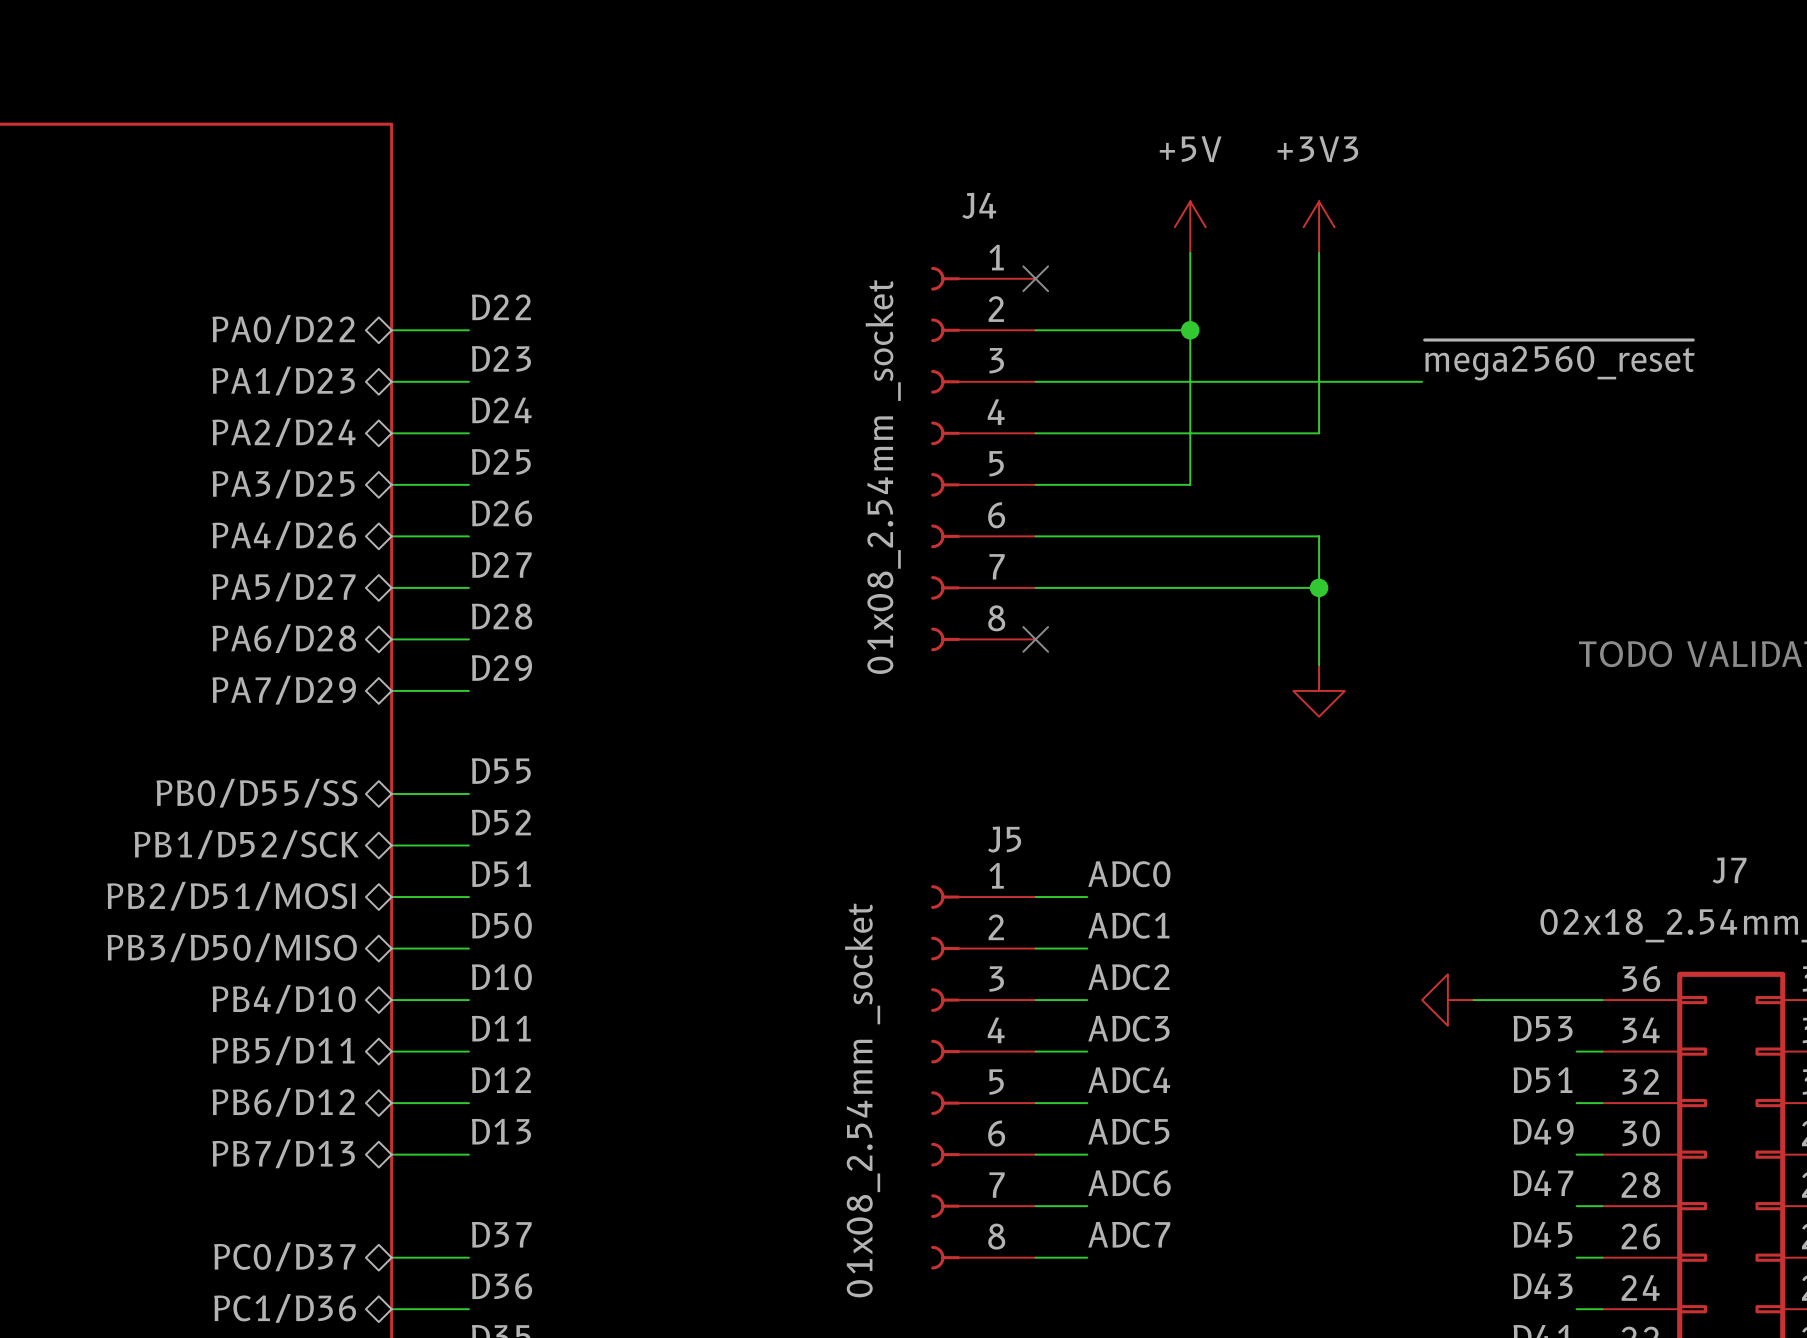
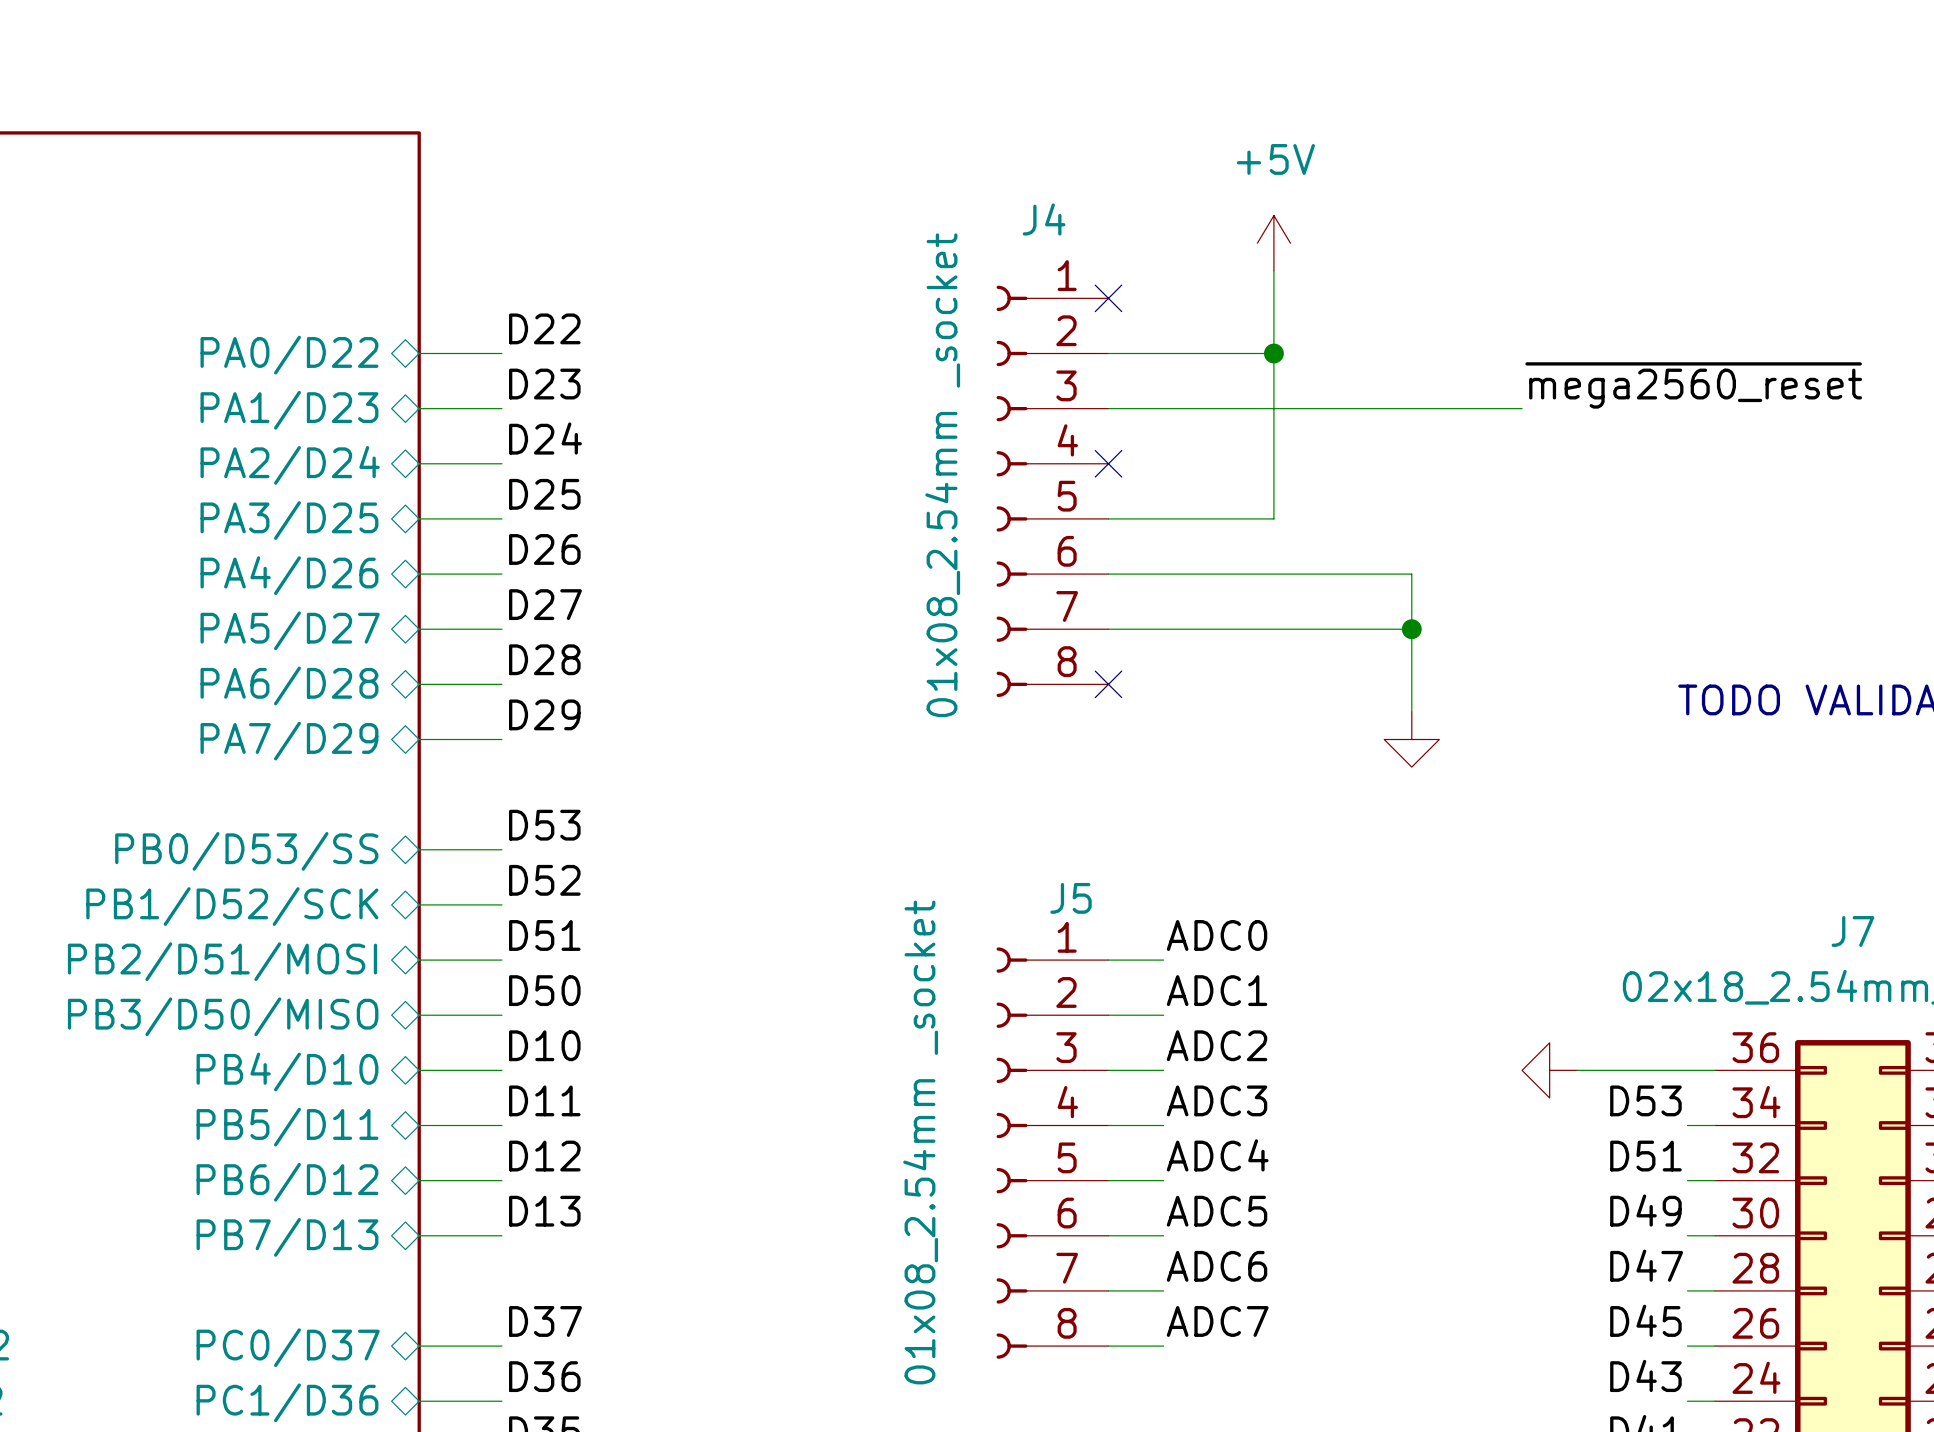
power symbol: +3V3 (1319, 227) -> none
wire: (1319, 253) (1319, 433) (1035, 433) -> none
no-connect mark: none -> (1108, 463)
label: D55 (501, 771) -> D53 (544, 825)
sheet pin: PB0/D55/SS (256, 793) -> PB0/D53/SS (246, 851)

